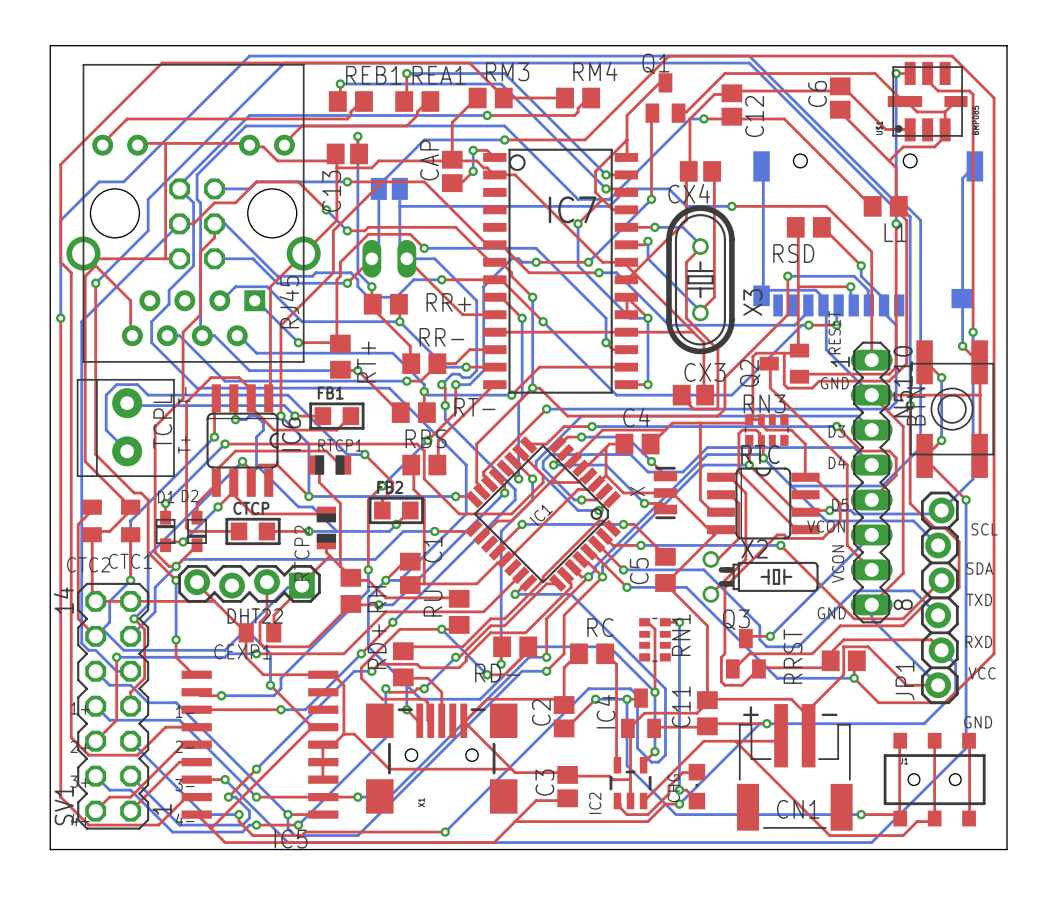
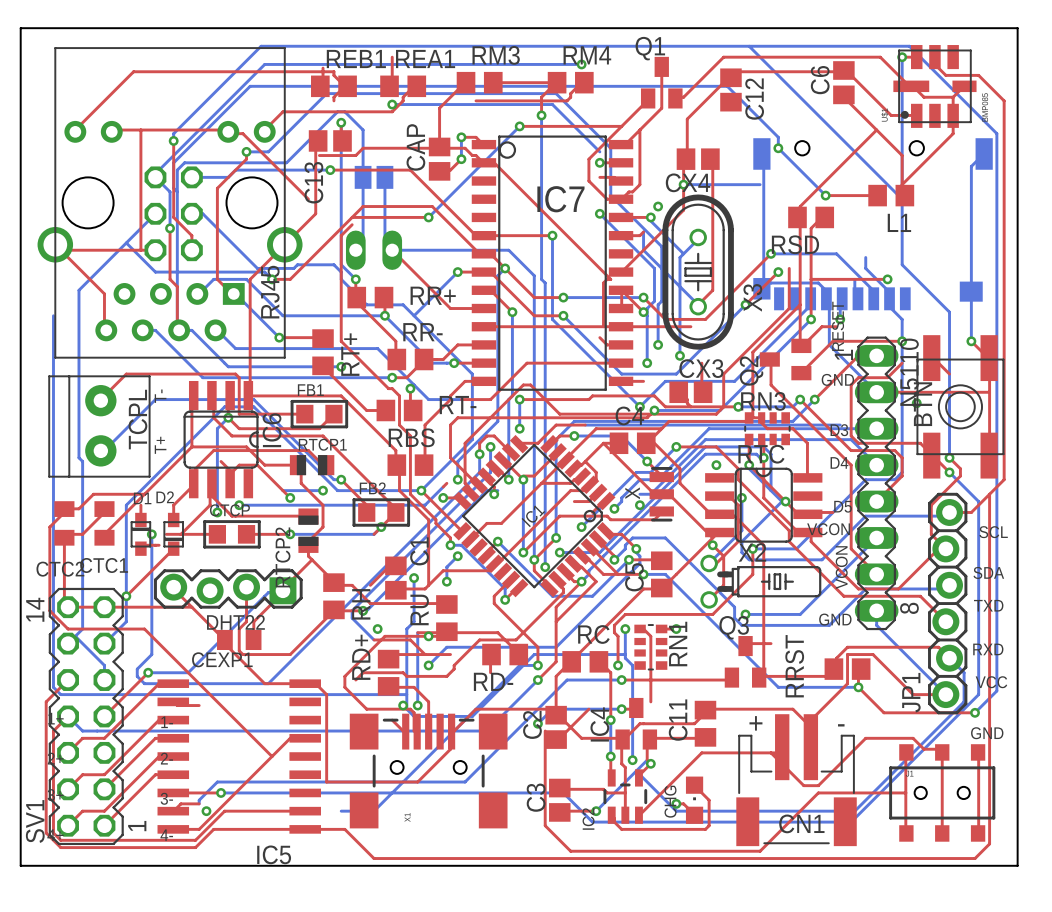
bottom track: (284, 63) (148, 199) (148, 230) (95, 283) -> (264, 46) (261, 46) (173, 133) (173, 140)
bottom track: none -> (749, 46) (909, 46) (996, 133) (996, 690) (975, 712)
bottom track: (406, 73) (504, 73) (606, 174) -> none
via: (406, 73) -> none
via: none -> (581, 64)
bottom track: (340, 84) (501, 84) (606, 188) -> none
via: (340, 84) -> none
top track: (665, 84) (658, 84) (627, 115) (627, 157) -> (661, 68) (661, 108) (625, 144) (621, 144)
top track: (840, 87) (836, 91) (731, 91) -> (843, 71) (734, 71) (687, 119)
top track: (731, 93) (714, 94) (689, 118) (689, 132) -> none
top track: (973, 94) (973, 332) -> (982, 79) (1004, 100)
top track: (504, 98) (469, 63) (162, 63) (60, 164) (60, 262) (71, 272) (71, 737) (88, 755) (137, 755) -> (68, 789) (82, 774) (104, 774) (111, 767)
top track: none -> (556, 82) (541, 97) (541, 115)
bottom track: (249, 115) (487, 115) -> (228, 100) (264, 64) (581, 64)
top track: (350, 115) (347, 118) (127, 118) -> (344, 86) (333, 75) (333, 71) (133, 71) (100, 104)
via: (487, 115) -> none
top track: (651, 115) (651, 199) -> (647, 100) (621, 126) (577, 126)
top track: (994, 115) (994, 98) (952, 56) (668, 56) (585, 139) -> none
bottom track: none -> (392, 104) (552, 104) (599, 151)
via: none -> (392, 104)
top track: (703, 118) (784, 118) (871, 206) -> (829, 195) (876, 195)
bottom track: (703, 118) (689, 118) (609, 199) (578, 199) (504, 125) (361, 125) -> none
via: (703, 118) -> none
bottom track: (246, 125) (354, 125) -> (177, 191) (177, 170) (184, 162) (286, 162) (337, 111)
bottom track: none -> (224, 111) (250, 86) (727, 86) (778, 137) (778, 148) (825, 195)
bottom track: none -> (541, 115) (541, 279) (545, 283) (545, 567)
via: none -> (541, 115)
top track: (945, 136) (934, 146) (903, 146) (889, 160) -> (953, 122) (953, 133) (902, 184)
top track: (504, 139) (529, 139) -> none
bottom track: (504, 139) (424, 139) (385, 178) (385, 181) (378, 188) -> (344, 111) (363, 130) (363, 177)
via: (504, 139) -> none
bottom track: none -> (519, 126) (428, 217)
via: none -> (519, 126)
top track: none -> (639, 130) (639, 184) (621, 199)
top track: none -> (876, 130) (800, 206) (800, 217)
top track: none -> (173, 140) (173, 217) (191, 235) (191, 250)
via: none -> (173, 140)
top track: (277, 160) (336, 160) (335, 153) (336, 153) (336, 220) (333, 223) -> (318, 140) (315, 140) (315, 213)
via: none -> (778, 148)
top track: none -> (246, 151) (246, 159) (235, 170)
bottom track: none -> (246, 151) (268, 151) (326, 93) (556, 93) (610, 148) (610, 195) (661, 246) (661, 301) (658, 304) (658, 344)
via: none -> (246, 151)
top track: (504, 174) (515, 174) (602, 262) (626, 262) -> (494, 162) (610, 279) (607, 279) (603, 283) (603, 326)
top track: (256, 181) (298, 181) -> (257, 148) (279, 170)
top track: (382, 181) (333, 230) (333, 272) (280, 325) (280, 416) -> none
via: (606, 188) -> none
bottom track: none -> (683, 184) (760, 184)
via: none -> (683, 184)
bottom track: (896, 195) (920, 220) (920, 447) (896, 472) -> (902, 399) (902, 472)
top track: (239, 199) (235, 202) (214, 202) (193, 223) (179, 223) -> (217, 188) (217, 279) (233, 293)
top track: (602, 199) (578, 223) -> none
bottom track: (651, 199) (588, 262) -> none
via: (651, 199) -> none
bottom track: (399, 206) (609, 206) (627, 188) (668, 188) (686, 206) (731, 206) -> none
top track: (731, 206) (822, 206) -> none
via: (731, 206) -> none
via: none -> (825, 195)
top track: (826, 206) (871, 251) (871, 360) -> (814, 399) (858, 355) (876, 355)
top track: (898, 206) (899, 213) (906, 220) (906, 363) (889, 381) (882, 381) -> (894, 370) (887, 377)
bottom track: (326, 209) (347, 230) -> none
via: (326, 209) -> none
via: none -> (658, 206)
top track: (214, 223) (214, 237) (200, 251) (200, 293) -> (170, 228) (170, 279) (177, 286)
bottom track: (578, 223) (578, 265) (630, 318) (648, 318) (648, 384) -> none
via: (578, 223) -> none
bottom track: none -> (599, 213) (654, 268) (654, 301) (647, 308) (647, 363)
via: none -> (599, 213)
top track: (896, 223) (896, 367) -> none
bottom track: none -> (902, 213) (902, 264) (949, 312) (949, 374)
via: (896, 223) -> none
top track: (441, 227) (455, 227) -> (352, 217) (363, 206) (432, 206) (443, 217)
via: none -> (428, 217)
bottom track: none -> (647, 217) (683, 253)
bottom track: (654, 227) (682, 227) (700, 246) -> (679, 355) (679, 257) (698, 237)
top track: (821, 227) (861, 265) -> (824, 217) (822, 217) (811, 228) (811, 319)
top track: (347, 230) (364, 230) -> (272, 279) (290, 279) (348, 221)
via: (347, 230) -> none
top track: (368, 234) (410, 234) (424, 248) -> none
bottom track: (193, 237) (193, 265) (169, 290) (169, 304) (151, 321) (151, 342) (197, 388) (389, 388) (466, 465) (466, 513) (399, 580) (385, 580) (368, 597) (368, 604) -> (490, 446) (490, 472) (352, 610)
via: none -> (170, 228)
via: (648, 241) -> none
top track: (357, 244) (340, 262) (340, 276) (336, 279) (336, 342) (340, 343) -> (341, 235) (341, 341) (388, 388) (392, 388) (399, 395) (399, 425) (410, 435) (410, 450)
top track: (501, 244) (529, 272) (599, 272) -> (490, 235) (552, 235)
via: none -> (552, 235)
top track: (700, 246) (686, 262) (686, 318) (717, 349) (717, 409) -> (738, 406) (716, 406)
bottom track: (424, 248) (536, 248) (606, 318) (606, 342) -> none
via: (424, 248) -> none
bottom track: none -> (126, 242) (155, 272) (264, 272) (272, 279)
bottom track: (214, 258) (253, 258) (277, 283) (347, 283) -> none
top track: (371, 258) (347, 283) -> none
bottom track: (434, 258) (476, 300) (476, 370) (469, 377) (452, 374) (441, 384) -> none
bottom track: (511, 258) (483, 286) (483, 370) (469, 384) (455, 384) -> (501, 250) (421, 250)
bottom track: (522, 262) (536, 262) -> (512, 253) (534, 275) (534, 461)
top track: (536, 262) (588, 262) -> none
via: (536, 262) -> none
via: (588, 262) -> none
top track: (623, 262) (703, 342) (703, 367) -> none
top track: none -> (771, 253) (705, 319) (665, 319) (643, 297)
via: none -> (771, 253)
top track: (95, 265) (85, 276) (85, 461) (130, 506) -> none
via: (861, 265) -> none
top track: (511, 272) (511, 276) (532, 297) -> (501, 264) (534, 297) (563, 297)
bottom track: (599, 272) (616, 272) (668, 325) (794, 325) -> (552, 235) (552, 319) (639, 406) (665, 381) (734, 381) (796, 319)
via: (599, 272) -> none
bottom track: none -> (505, 268) (497, 275) (497, 421) (457, 461) (457, 479)
via: none -> (505, 268)
bottom track: (787, 276) (854, 276) (868, 290) (868, 297) -> (771, 253) (836, 253) (873, 290)
via: (787, 276) -> none
top track: (441, 279) (469, 279) -> (534, 315) (563, 315)
bottom track: (441, 279) (413, 279) (396, 297) (368, 297) -> (290, 443) (337, 490) (421, 490) (472, 439) (472, 374) (403, 304) (366, 304) (352, 290)
via: (441, 279) -> none
bottom track: none -> (457, 272) (414, 315)
via: none -> (457, 272)
top track: none -> (778, 272) (745, 304)
via: none -> (778, 272)
top track: (95, 283) (95, 454) (134, 493) -> (64, 508) (78, 508) (93, 494) (108, 494)
via: (95, 283) -> none
via: (347, 283) -> none
via: none -> (272, 279)
top track: (798, 286) (808, 286) -> none
top track: none -> (854, 279) (887, 279)
via: (850, 286) -> none
via: none -> (887, 279)
bottom track: (106, 297) (81, 321) -> (78, 290) (78, 392)
bottom track: (532, 297) (532, 388) -> none
via: (532, 297) -> none
bottom track: none -> (563, 297) (643, 297)
via: none -> (563, 297)
via: none -> (643, 297)
bottom track: none -> (745, 304) (676, 374) (621, 374) (563, 315)
via: none -> (745, 304)
top track: (200, 314) (183, 332) (183, 398) (155, 426) (155, 552) (169, 566) (176, 566) -> (177, 308) (177, 330) (179, 330)
top track: (60, 318) (60, 797) (81, 818) -> (68, 716) (53, 731) (53, 833)
bottom track: (60, 318) (60, 220) (99, 181) (123, 181) (249, 56) (749, 56) (910, 216) (910, 405) -> none
via: (60, 318) -> none
bottom track: (543, 321) (616, 395) (731, 395) (801, 325) (808, 325) -> (654, 410) (720, 410) (811, 319)
via: (543, 321) -> none
via: none -> (563, 315)
top track: (808, 325) (836, 325) -> none
top track: none -> (836, 326) (822, 326) (801, 345)
bottom track: (973, 332) (973, 479) (941, 510) -> none
via: (973, 332) -> none
via: (606, 342) -> none
via: none -> (902, 341)
via: none -> (658, 344)
top track: (799, 350) (798, 353) (756, 353) -> (800, 304) (756, 348)
top track: (784, 353) (784, 384) (787, 388) (812, 388) (819, 381) (854, 381) -> none
via: none -> (679, 355)
top track: (539, 367) (511, 395) -> (530, 363) (527, 363) (490, 399) (461, 399)
via: none -> (647, 363)
top track: (340, 370) (357, 370) (399, 412) -> (323, 366) (366, 410) (384, 410)
top track: (801, 374) (889, 374) -> (803, 370) (832, 341) (902, 341)
top track: (211, 377) (186, 402) (186, 527) (190, 531) -> (188, 374) (126, 374) (100, 400)
top track: (239, 377) (249, 388) (249, 395) (253, 398) (253, 409) (273, 430) -> (230, 395) (228, 395) (228, 417) (239, 428) (253, 428)
top track: none -> (217, 374) (235, 374) (239, 377) (239, 414) (275, 414)
via: (941, 377) -> none
bottom track: (424, 384) (424, 391) (427, 395) (511, 395) -> (410, 381) (428, 399) (461, 399)
top track: (441, 384) (445, 388) (445, 405) -> none
via: (441, 384) -> none
top track: (455, 384) (455, 412) (427, 440) -> none
via: (455, 384) -> none
top track: (494, 384) (438, 440) -> (483, 381) (465, 381) (450, 395) (450, 399) (425, 425) (425, 439)
via: (648, 384) -> none
via: (532, 388) -> none
bottom track: (106, 395) (116, 384) (137, 384) (148, 395) (287, 395) (347, 454) (364, 454) -> none
via: (511, 395) -> none
top track: (871, 395) (903, 426) (903, 573) -> (942, 545) (909, 578)
top track: none -> (248, 395) (341, 395) (395, 450) (396, 465)
top track: none -> (519, 399) (588, 399) (592, 395) (654, 395) (665, 406) (690, 406)
bottom track: none -> (519, 399) (519, 428)
via: none -> (519, 399)
via: none -> (800, 399)
bottom track: none -> (814, 399) (792, 421) (574, 421) (556, 439) (556, 537)
via: none -> (814, 399)
bottom track: (896, 402) (889, 409) (791, 409) -> (800, 399) (792, 406)
bottom track: (127, 403) (127, 405) (284, 405) (294, 416) -> none
bottom track: (445, 405) (445, 419) (515, 489) (515, 499) (392, 622) -> none
via: (445, 405) -> none
top track: (910, 405) (910, 503) (934, 527) (945, 527) (959, 541) (959, 587) (948, 597) (931, 597) (903, 625) (840, 625) (812, 653) (749, 653) (732, 668) -> (621, 680) (730, 680) (731, 677)
top track: (546, 409) (483, 472) (487, 482) -> (654, 410) (647, 417) (457, 417) (450, 425) (450, 457) (476, 483)
bottom track: (546, 409) (738, 409) -> none
via: (546, 409) -> none
via: none -> (639, 406)
via: none -> (738, 406)
via: none -> (654, 410)
via: (280, 416) -> none
via: (294, 416) -> none
top track: none -> (213, 417) (231, 435) (323, 435) (395, 508) (395, 512)
bottom track: (235, 419) (246, 419) (249, 416) (256, 416) (263, 423) (263, 430) (256, 437) (256, 465) (298, 506) (312, 506) (336, 531) -> none
via position: (235, 419) -> (228, 417)
bottom track: none -> (228, 417) (217, 428) (217, 512)
top track: (700, 423) (700, 499) -> (646, 443) (650, 439) (679, 468) (679, 483) (698, 501)
via: (592, 426) -> none
top track: (836, 426) (847, 437) -> (858, 377) (851, 385) (851, 435)
via: (836, 426) -> none
bottom track: (106, 430) (127, 451) -> (341, 479) (333, 479) (253, 399) (155, 399) (100, 454) (100, 450)
via: none -> (519, 428)
bottom track: (871, 430) (857, 416) (581, 416) (536, 461) (536, 468) (578, 510) (599, 510) -> (876, 428) (709, 428) (658, 479) (639, 479) (621, 497) (621, 501) (614, 508)
top track: none -> (191, 435) (191, 446)
bottom track: (214, 437) (130, 520) (130, 580) (109, 601) -> (78, 428) (78, 457) (82, 461) (82, 607)
via: (214, 437) -> none
bottom track: (427, 440) (382, 486) -> none
via: (427, 440) -> none
top track: (761, 440) (759, 433) (756, 430) (742, 430) (738, 433) (738, 468) -> (676, 446) (716, 446) (738, 468)
top track: (941, 440) (924, 458) (966, 499) -> none
bottom track: none -> (949, 439) (949, 457)
via: (941, 440) -> none
top track: (225, 444) (417, 444) (424, 451) -> none
bottom track: (225, 444) (165, 503) -> none
via: (225, 444) -> none
bottom track: (308, 444) (308, 496) (455, 496) -> none
top track: (854, 444) (861, 451) -> (800, 399) (851, 450) (865, 450)
top track: none -> (858, 443) (920, 443) (949, 472)
top track: none -> (191, 446) (246, 446) (264, 465) (297, 465)
via: none -> (490, 446)
top track: (606, 447) (606, 475) -> none
via: none -> (676, 446)
bottom track: (763, 447) (854, 447) -> (763, 446) (771, 454) (771, 490)
bottom track: none -> (858, 446) (851, 439) (705, 439) (650, 494) (639, 494)
top track: (520, 452) (543, 475) (543, 482) (511, 513) (459, 513) -> (511, 452) (494, 435) (486, 435) (479, 443) (479, 454)
top track: (364, 454) (392, 482) (392, 489) (382, 499) (382, 503) -> (341, 479) (366, 505)
via: (364, 454) -> none
bottom track: none -> (479, 454) (479, 472) (268, 683) (144, 683) (137, 676) (137, 669) (151, 654) (151, 647)
via: none -> (479, 454)
bottom track: (756, 454) (759, 454) (826, 520) (913, 520) (938, 545) -> (756, 454) (760, 457)
top track: none -> (949, 457) (960, 468) (960, 476) (931, 505) (931, 534) (945, 548)
via: none -> (949, 457)
bottom track: (242, 461) (148, 555) (148, 604) (134, 618) -> none
via: (242, 461) -> none
bottom track: (543, 461) (550, 454) (630, 454) (648, 472) -> (581, 527) (636, 472) (643, 472)
top track: none -> (545, 465) (534, 476) (523, 476)
bottom track: (553, 465) (606, 465) (644, 503) -> none
via: (553, 465) -> none
via: none -> (716, 465)
bottom track: (749, 465) (703, 465) (602, 566) (602, 576) -> none
bottom track: (543, 468) (574, 499) (581, 499) -> (534, 468) (534, 559)
bottom track: none -> (749, 468) (781, 501)
bottom track: (654, 472) (682, 472) -> (650, 472) (676, 446)
bottom track: none -> (679, 472) (599, 552) (559, 552)
top track: (738, 472) (763, 496) -> (760, 457) (763, 457) (763, 497)
top track: none -> (738, 472) (738, 479) (789, 530) (789, 541) (843, 596) (920, 596) (945, 621)
bottom track: none -> (949, 472) (978, 501) (978, 694) (851, 822) (592, 822) (563, 792) (221, 792)
via: none -> (949, 472)
top track: (606, 475) (602, 479) -> (585, 461) (596, 472) (596, 479)
top track: (606, 475) (623, 493) (658, 493) -> (603, 443) (654, 494)
top track: (721, 477) (721, 479) (731, 479) (745, 493) (745, 559) (724, 580) -> (712, 545) (723, 556) (723, 585)
top track: (805, 477) (815, 479) (840, 503) (840, 520) (822, 538) (787, 538) (784, 534) (777, 534) (724, 587) (724, 653) (721, 657) (721, 681) (724, 685) (742, 685) (758, 668) -> (719, 514) (720, 516) (734, 516) (763, 545) (763, 676) (759, 677)
via: none -> (341, 479)
top track: (424, 479) (434, 489) -> (410, 479) (410, 494) (435, 519) (435, 523) (450, 537) (450, 545)
via: none -> (457, 479)
bottom track: (889, 479) (882, 486) (791, 486) -> (894, 479) (865, 479) (796, 548) (781, 548)
top track: (994, 479) (994, 653) (945, 702) -> (1004, 479) (971, 512) (949, 512)
top track: none -> (446, 483) (443, 486)
top track: (382, 486) (368, 499) (368, 569) -> none
via: (382, 486) -> none
bottom track: none -> (443, 486) (425, 505) (239, 505)
bottom track: none -> (282, 490) (323, 490)
via: none -> (323, 490)
via: none -> (421, 490)
bottom track: none -> (497, 490) (486, 490) (363, 614)
top track: (141, 493) (148, 499) (148, 552) (176, 580) -> (115, 494) (144, 494)
top track: (232, 493) (218, 506) -> (210, 494) (210, 505) (180, 534)
bottom track: (504, 493) (392, 604) (378, 604) -> none
top track: none -> (989, 494) (989, 843) (975, 858) (483, 858)
bottom track: none -> (741, 497) (741, 530) (709, 563)
via: none -> (741, 497)
top track: (424, 499) (424, 583) -> (410, 501) (428, 519) (428, 585)
bottom track: (532, 499) (501, 531) (501, 664) -> (523, 501) (523, 552)
via: (581, 499) -> none
via: none -> (785, 501)
bottom track: (966, 499) (966, 748) (871, 842) (287, 842) (225, 779) -> none
via: (966, 499) -> none
via: (165, 503) -> none
via: none -> (239, 505)
top track: (644, 503) (661, 503) (665, 509) -> (523, 552) (559, 516) (607, 516) (610, 519) (654, 519) (661, 511)
bottom track: (218, 506) (183, 541) -> none
via: (218, 506) -> none
via: none -> (614, 508)
via: none -> (217, 512)
via: (599, 510) -> none
bottom track: (829, 510) (850, 510) (854, 513) (861, 513) -> (781, 501) (741, 541) (741, 552) (749, 559) (822, 559) (865, 516)
via: (829, 510) -> none
top track: (340, 524) (340, 566) -> (323, 527) (308, 541) (308, 545)
top track: none -> (381, 527) (374, 534)
top track: (522, 524) (508, 538) -> none
bottom track: (522, 524) (623, 524) -> none
via: (522, 524) -> none
via: none -> (581, 527)
top track: (623, 524) (634, 524) (665, 555) -> (628, 559) (661, 559)
via: (623, 524) -> none
top track: (474, 528) (473, 531) (434, 531) -> (462, 531) (446, 516)
top track: (612, 528) (602, 520) (599, 520) (504, 618) (490, 618) (462, 646) -> none
bottom track: none -> (151, 534) (151, 585)
bottom track: (434, 531) (403, 531) (375, 559) (183, 559) (155, 587) (155, 611) (151, 615) -> (261, 414) (253, 406) (224, 406) (126, 505) (126, 621)
via: (434, 531) -> none
top track: (130, 534) (130, 580) -> (104, 537) (104, 534) (191, 446)
via: none -> (556, 537)
bottom track: none -> (497, 541) (552, 596) (592, 596) (628, 559)
via: none -> (497, 541)
via position: (183, 541) -> (151, 534)
via: none -> (450, 545)
via: none -> (712, 545)
top track: (613, 545) (641, 545) -> (606, 531) (607, 534) (621, 534) (636, 548)
top track: none -> (607, 548) (614, 556) (614, 559)
bottom track: (641, 545) (752, 545) -> (636, 548) (636, 552) (639, 556) (639, 563) (556, 647) (446, 647) (428, 665)
top track: none -> (752, 548) (752, 574) (712, 614) (625, 614) (614, 625) (614, 632) (618, 636) (618, 665)
via: none -> (752, 548)
top track: (780, 545) (854, 618) (903, 618) (941, 580) -> none
via: (780, 545) -> none
via: none -> (523, 552)
via: none -> (559, 552)
bottom track: none -> (457, 556) (446, 567) (446, 581)
via: none -> (457, 556)
via: none -> (534, 559)
bottom track: none -> (614, 559) (632, 537) (665, 537) (701, 574)
via: none -> (614, 559)
via: none -> (628, 559)
top track: (504, 562) (497, 562) (476, 583) (438, 583) -> (494, 567) (490, 570) (443, 570) (425, 588)
via: none -> (545, 567)
top track: none -> (151, 570) (126, 596)
via: (176, 566) -> none
bottom track: (368, 569) (368, 590) (280, 678) (280, 688) (273, 695) (221, 695) -> none
via: (368, 569) -> none
top track: (609, 569) (627, 587) -> (603, 574) (643, 574)
bottom track: (623, 569) (648, 569) -> none
via: (623, 569) -> none
via: none -> (643, 574)
bottom track: (668, 569) (703, 569) -> (665, 574) (683, 592)
via: none -> (414, 578)
via: none -> (446, 581)
via: (602, 576) -> none
via: (130, 580) -> none
via: (176, 580) -> none
via: (385, 580) -> none
top track: (557, 582) (546, 583) (504, 625) -> (549, 588) (534, 570) (534, 559) (556, 537)
top track: (665, 583) (707, 625) (707, 699) -> (661, 588) (643, 588) (570, 661)
top track: (892, 583) (871, 604) -> (898, 588) (858, 588) (811, 541) (811, 534) (807, 532)
bottom track: (627, 587) (686, 587) -> none
via: (627, 587) -> none
via: none -> (126, 596)
top track: (504, 590) (483, 611) (385, 611) (343, 653) (256, 653) -> (494, 596) (494, 603) (537, 647)
bottom track: (854, 590) (913, 590) (938, 615) -> (858, 596) (865, 588) (945, 588) (949, 585)
bottom track: (515, 594) (571, 594) (665, 688) (665, 755) (658, 762) (651, 762) (637, 748) -> (505, 599) (505, 588) (461, 545) (450, 545)
top track: (564, 601) (546, 618) (546, 639) -> (556, 607) (556, 621)
bottom track: (735, 601) (759, 625) (759, 639) (766, 646) (798, 646) (826, 618) -> (734, 607) (734, 618) (741, 625) (829, 625)
top track: (78, 604) (78, 618) (95, 636) -> (49, 610) (68, 629) (144, 629) (272, 756)
via: none -> (745, 614)
bottom track: (798, 608) (770, 636) -> (800, 614) (745, 614)
bottom track: (368, 611) (368, 646) (420, 699) (480, 699) (532, 646) (543, 646) -> (414, 578) (414, 621) (406, 629) (406, 709) (414, 716) (472, 716) (534, 654)
bottom track: none -> (352, 618) (374, 639)
top track: (134, 618) (144, 629) (144, 678) (130, 692) (130, 706) -> (148, 672) (104, 716)
via: (134, 618) -> none
top track: (392, 622) (361, 653) -> none
via: none -> (625, 629)
bottom track: (679, 622) (679, 790) -> none
bottom track: none -> (417, 632) (417, 705)
top track: (490, 625) (459, 657) (455, 657) -> (479, 632) (417, 632)
bottom track: (246, 629) (270, 653) (270, 685) -> none
bottom track: (441, 629) (487, 674) -> none
top track: (246, 632) (246, 657) (263, 674) (284, 674) -> (224, 639) (228, 639) (228, 647) (264, 683)
top track: none -> (374, 639) (410, 639) (425, 654)
via: (770, 636) -> none
top track: (176, 639) (176, 657) (193, 674) -> none
via position: (176, 639) -> (148, 672)
bottom track: (81, 643) (88, 650) (95, 650) (116, 671) (130, 671) -> (53, 650) (53, 687) (60, 694) (82, 694)
top track: (528, 646) (525, 646) (525, 653) (504, 674) (487, 674) -> (518, 654) (497, 632) (494, 632)
bottom track: (609, 646) (654, 692) (654, 751) -> (603, 654) (625, 654)
bottom track: (123, 650) (225, 650) -> (148, 672) (188, 672) (202, 658)
bottom track: none -> (97, 658) (104, 665) (104, 680)
bottom track: (256, 653) (228, 653) (225, 657) (116, 657) -> none
via: (256, 653) -> none
bottom track: (361, 653) (305, 709) (280, 709) -> none
via: (361, 653) -> none
top track: (116, 657) (116, 720) (109, 727) -> (170, 683) (159, 683) (104, 738) (82, 738)
via: (116, 657) -> none
bottom track: (455, 657) (424, 688) -> none
via position: (455, 657) -> (428, 665)
via: none -> (618, 665)
via: (501, 664) -> none
top track: none -> (68, 680) (46, 701) (46, 833) (60, 847) (195, 847) (213, 829) (268, 829)
bottom track: (95, 671) (109, 685) -> none
bottom track: (371, 671) (354, 671) (256, 769) -> none
via: (371, 671) -> none
bottom track: (546, 671) (522, 671) (357, 835) (294, 835) (287, 828) (287, 814) (176, 702) (148, 702) (130, 685) -> (537, 680) (486, 731) (155, 731)
bottom track: none -> (621, 680) (567, 680) (465, 782) (217, 782) (199, 800) (199, 803)
via: none -> (621, 680)
via: (487, 674) -> none
bottom track: none -> (104, 694) (406, 694)
top track: (270, 685) (312, 727) (211, 828) -> none
via: (270, 685) -> none
bottom track: (406, 685) (406, 709) -> none
top track: (385, 688) (389, 692) (413, 692) (417, 688) (424, 688) -> none
bottom track: (385, 688) (385, 737) (298, 825) -> none
via: (385, 688) -> none
via: (424, 688) -> none
via: (654, 692) -> none
via: (221, 695) -> none
via: none -> (403, 705)
via: none -> (417, 705)
bottom track: (637, 695) (630, 688) (588, 688) (445, 832) -> (632, 705) (632, 665) (625, 658) (625, 629)
bottom track: none -> (588, 709) (552, 709) (537, 723)
via: (595, 699) -> none
bottom track: (627, 699) (627, 765) (675, 814) (861, 814) -> none
top track: none -> (953, 712) (975, 712)
via: none -> (975, 712)
top track: (196, 709) (280, 709) -> none
via: (280, 709) -> none
via: (406, 709) -> none
top track: (616, 709) (616, 744) -> none
bottom track: none -> (610, 720) (610, 756)
via: none -> (610, 720)
via: none -> (537, 723)
bottom track: (179, 720) (256, 797) -> none
top track: (463, 720) (515, 772) (567, 772) (567, 774) -> none
top track: none -> (545, 731) (545, 825) (570, 851) (760, 851) (818, 792) (905, 792)
top track: (766, 723) (707, 723) (707, 726) -> none
via: (766, 723) -> none
bottom track: (924, 723) (759, 723) (679, 804) -> (931, 734) (854, 811) (676, 811) (636, 771)
top track: (165, 727) (179, 727) -> (140, 738) (159, 720) (173, 720)
top track: none -> (155, 738) (104, 789)
top track: none -> (293, 738) (290, 738) (199, 829) (173, 829)
top track: (627, 728) (630, 730) (630, 755) -> (556, 712) (581, 738) (621, 738) (621, 763) (625, 767)
top track: none -> (649, 739) (647, 741) (647, 760)
top track: none -> (942, 752) (942, 749) (924, 749) (913, 738) (865, 738) (818, 785) (803, 785) (771, 752)
bottom track: (130, 741) (204, 814) (239, 814) -> none
top track: (735, 741) (829, 835) (903, 835) (917, 821) (934, 821) (934, 818) -> none
via: none -> (610, 756)
via: none -> (632, 760)
bottom track: none -> (647, 760) (596, 811)
top track: (256, 769) (228, 797) -> none
via: (256, 769) -> none
top track: (389, 769) (354, 734) (343, 734) (333, 744) (322, 744) (323, 779) -> (374, 782) (326, 782) (326, 745)
top track: (431, 769) (511, 769) -> (417, 782) (450, 749) (451, 731)
top track: (696, 772) (682, 772) (668, 786) (668, 793) (648, 814) -> (694, 785) (709, 800) (709, 825) (705, 829) (643, 829)
bottom track: (95, 776) (109, 790) (130, 790) (172, 832) (242, 832) (249, 825) (256, 825) -> none
bottom track: (130, 776) (179, 825) (242, 825) (249, 818) (249, 811) (235, 797) (228, 797) -> none
top track: none -> (202, 792) (221, 792)
via: (225, 779) -> none
via: none -> (221, 792)
top track: none -> (199, 803) (180, 803) (173, 811)
top track: (196, 797) (186, 797) (158, 825) -> (235, 811) (224, 811) (195, 840) (133, 840)
via: (256, 797) -> none
top track: (323, 797) (357, 797) -> none
via: (357, 797) -> none
via: none -> (596, 811)
top track: (567, 798) (567, 800) (536, 800) (494, 842) -> (559, 812) (596, 811)
top track: (679, 804) (665, 804) (648, 821) (515, 821) -> none
via: (679, 804) -> none
top track: (197, 814) (225, 842) (389, 842) -> (305, 829) (344, 829) (374, 858)
top track: (239, 814) (239, 821) (253, 835) (301, 835) (305, 832) (445, 832) -> none
via: (239, 814) -> none
via: (287, 814) -> none
top track: (861, 814) (899, 814) (900, 818) -> none
via: (861, 814) -> none
top track: (256, 825) (298, 825) -> none
via: (256, 825) -> none
via: (298, 825) -> none
via: (445, 832) -> none

